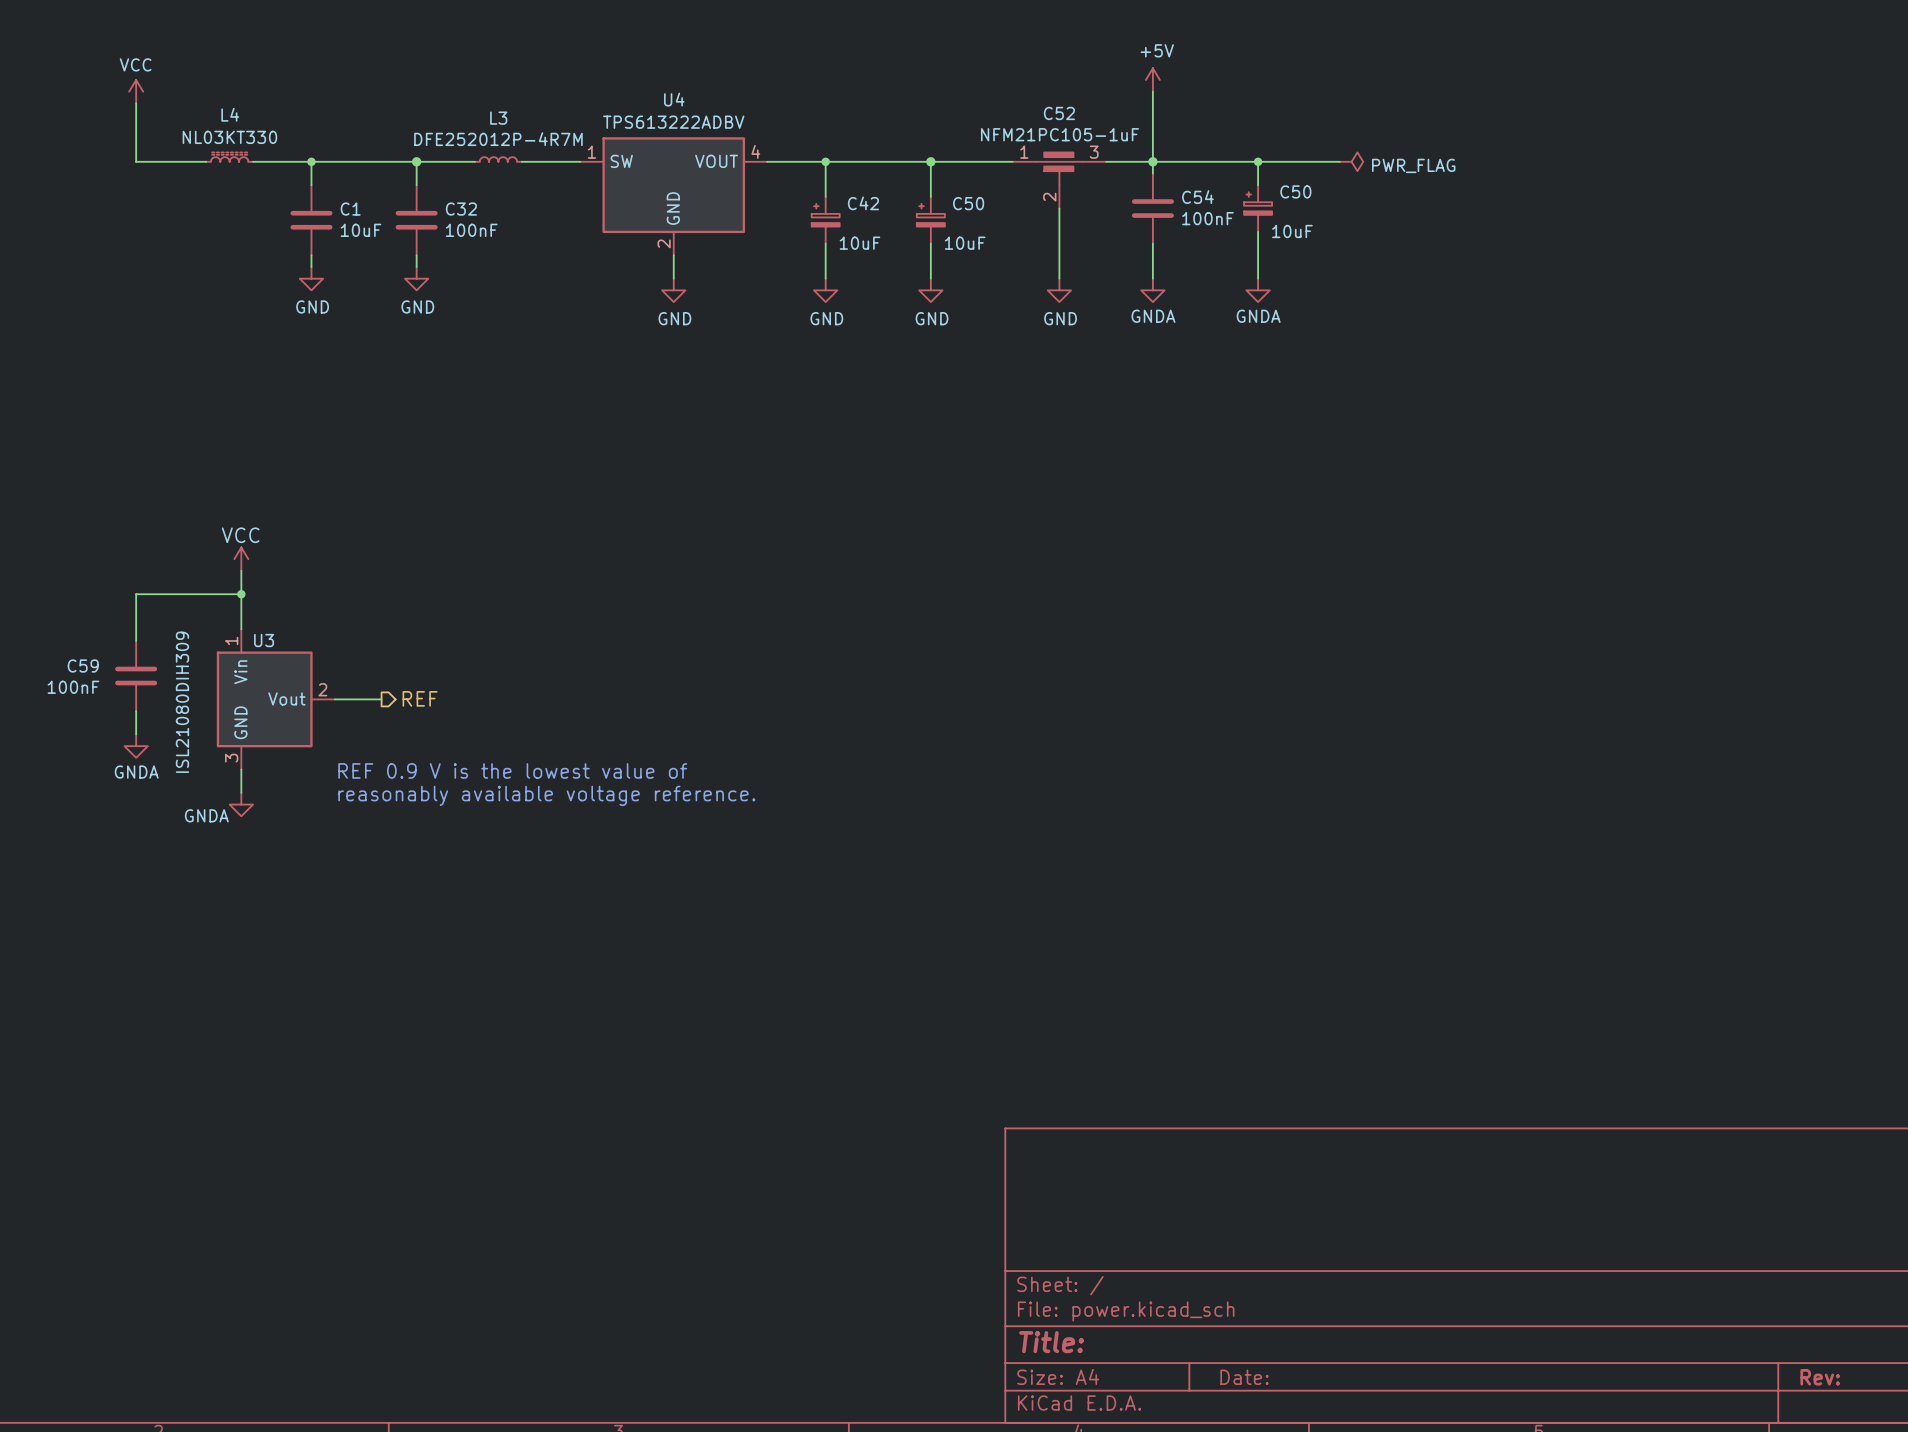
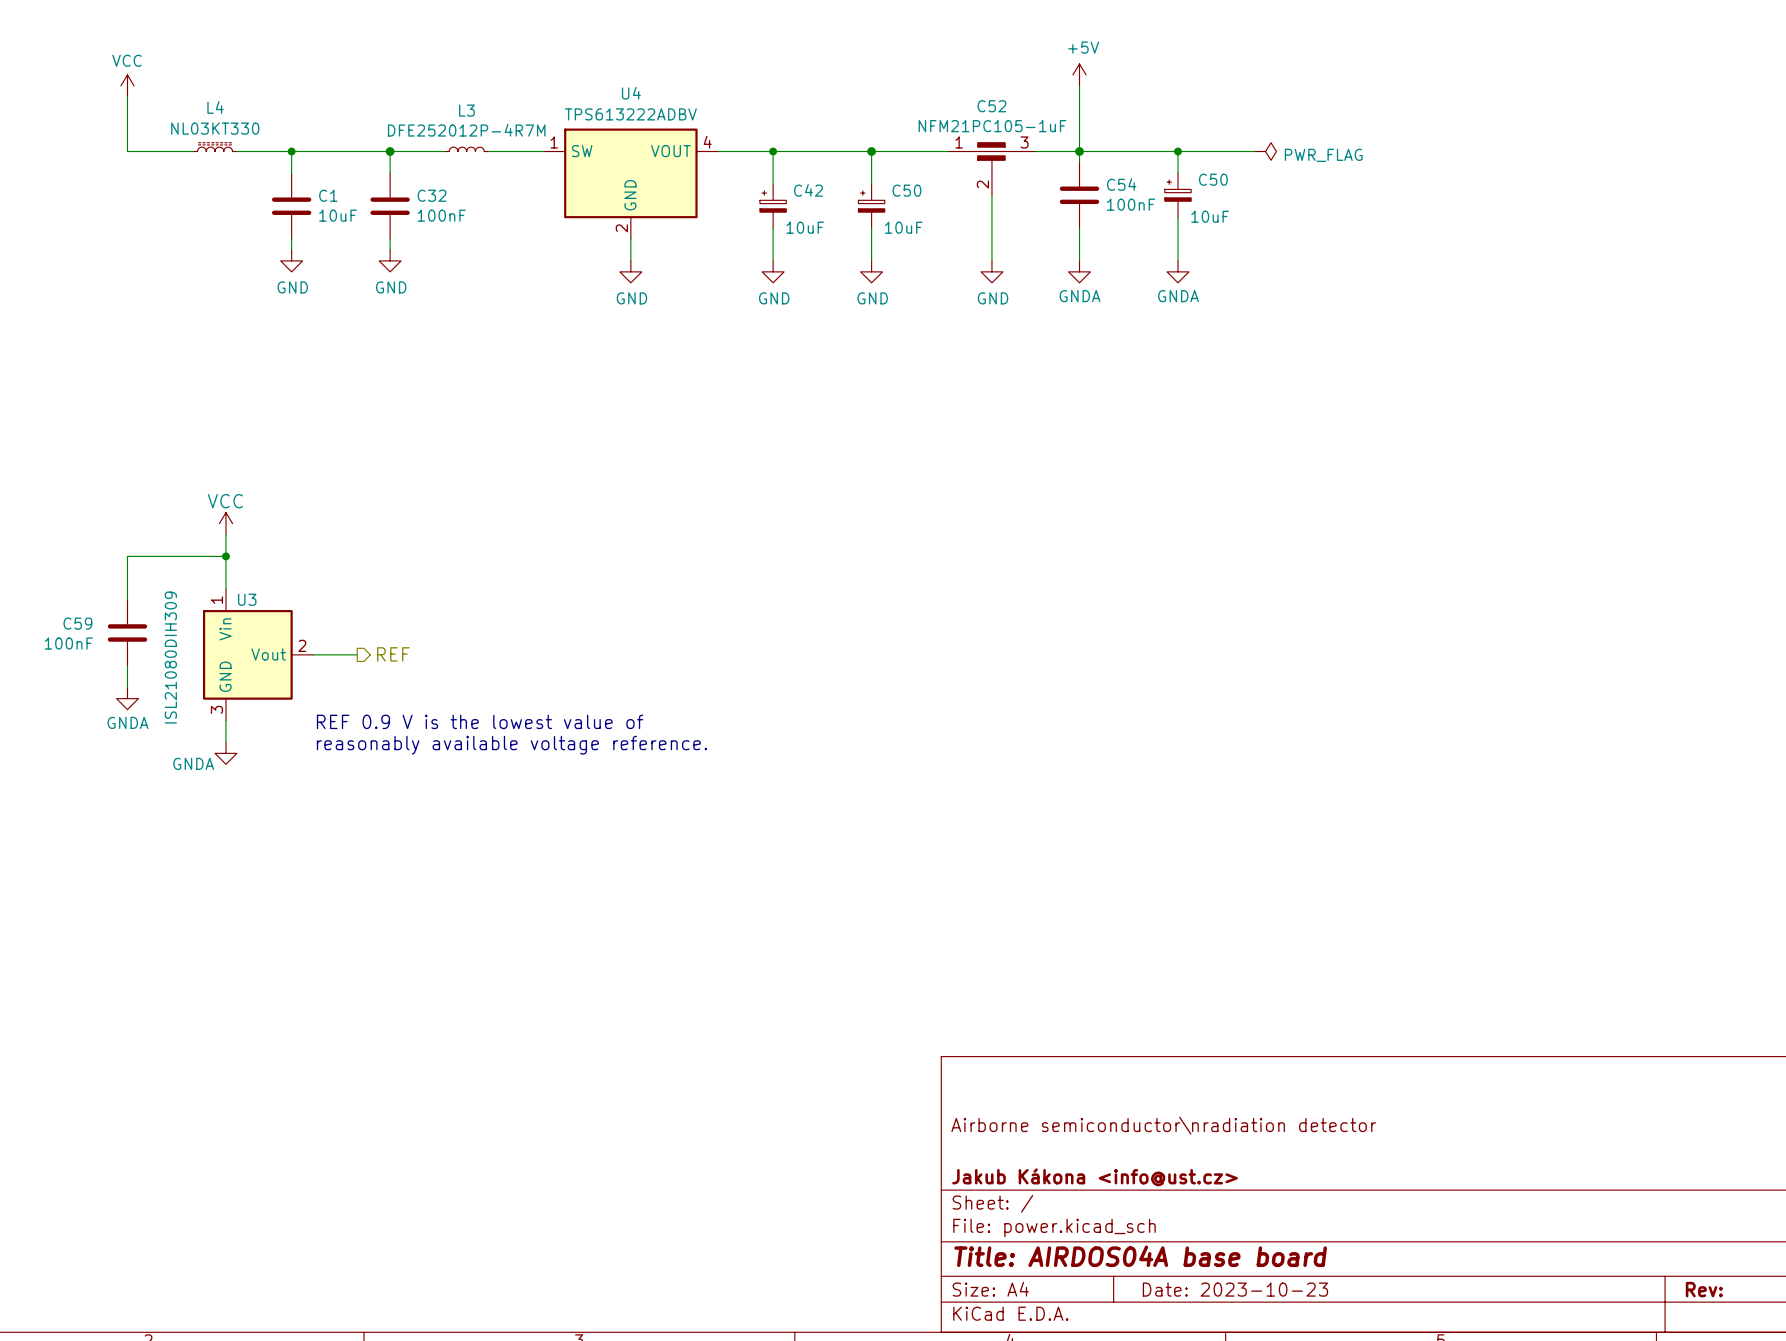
title block: none -> Airborne semiconductor\nradiation detector (1163, 1125)
title block: none -> Jakub Kákona <info@ust.cz> (1095, 1177)
title block: Title: (1051, 1342) -> Title: AIRDOS04A base board (1140, 1256)
title block: Date: (1244, 1377) -> Date: 2023-10-23 (1235, 1289)

